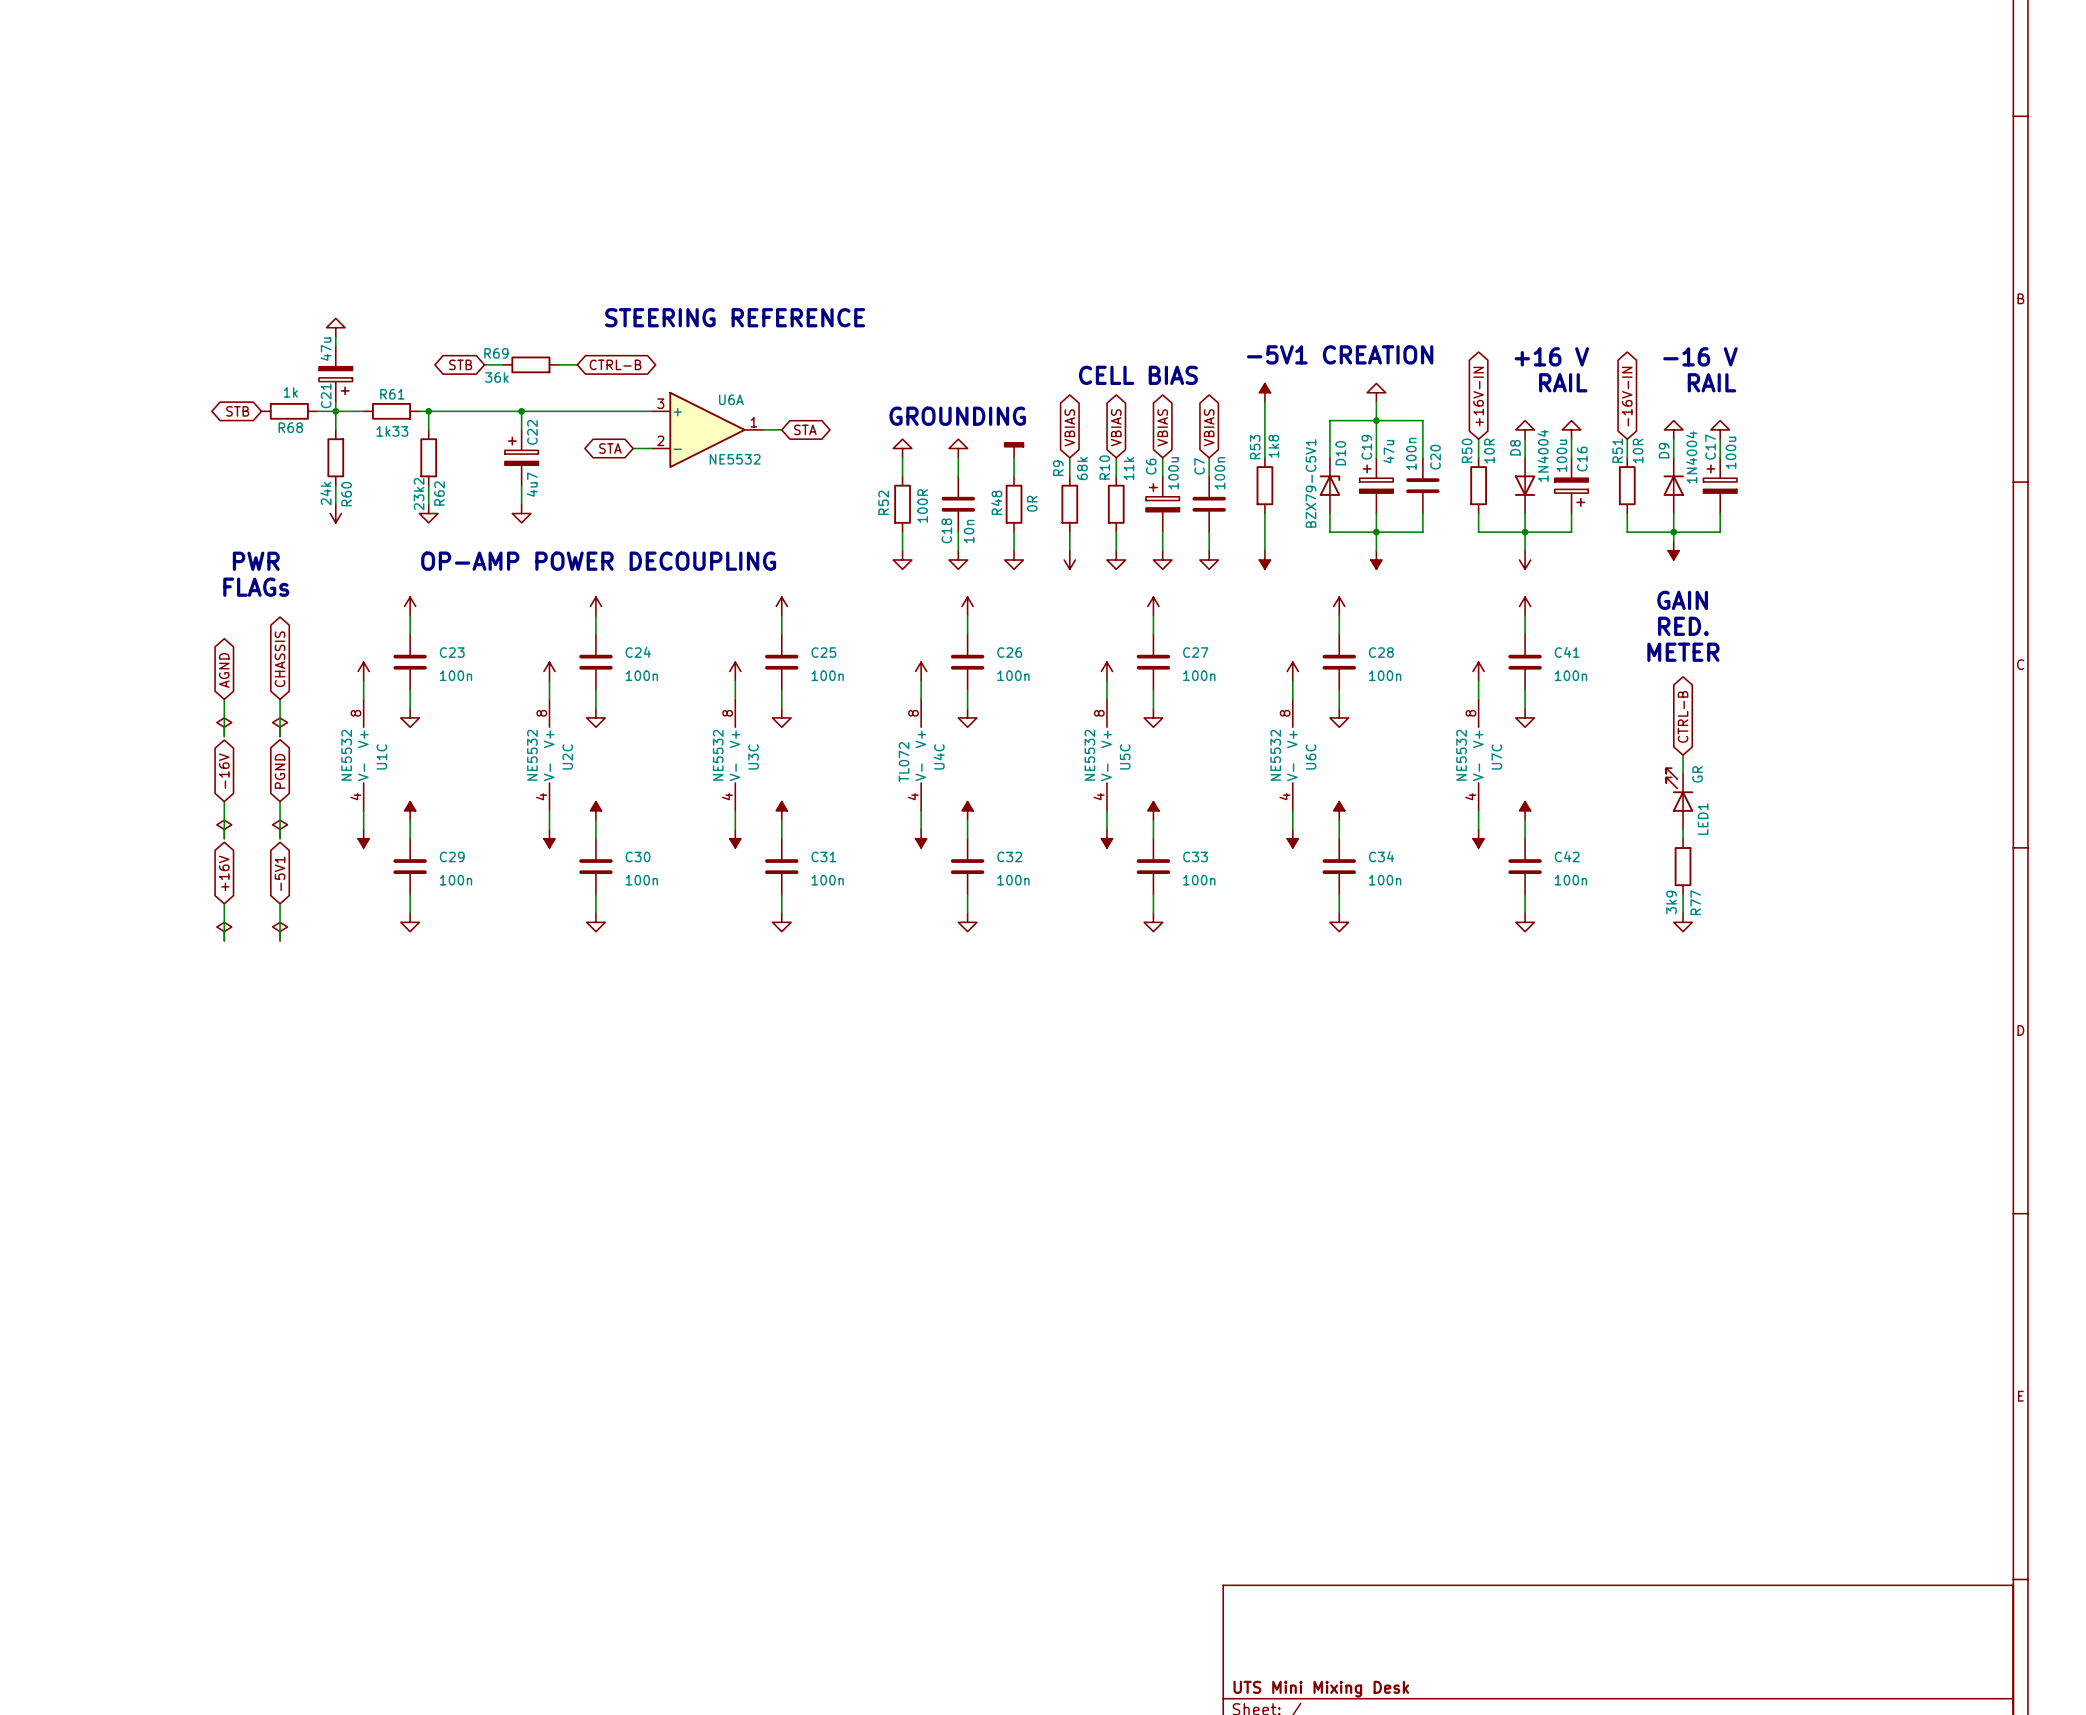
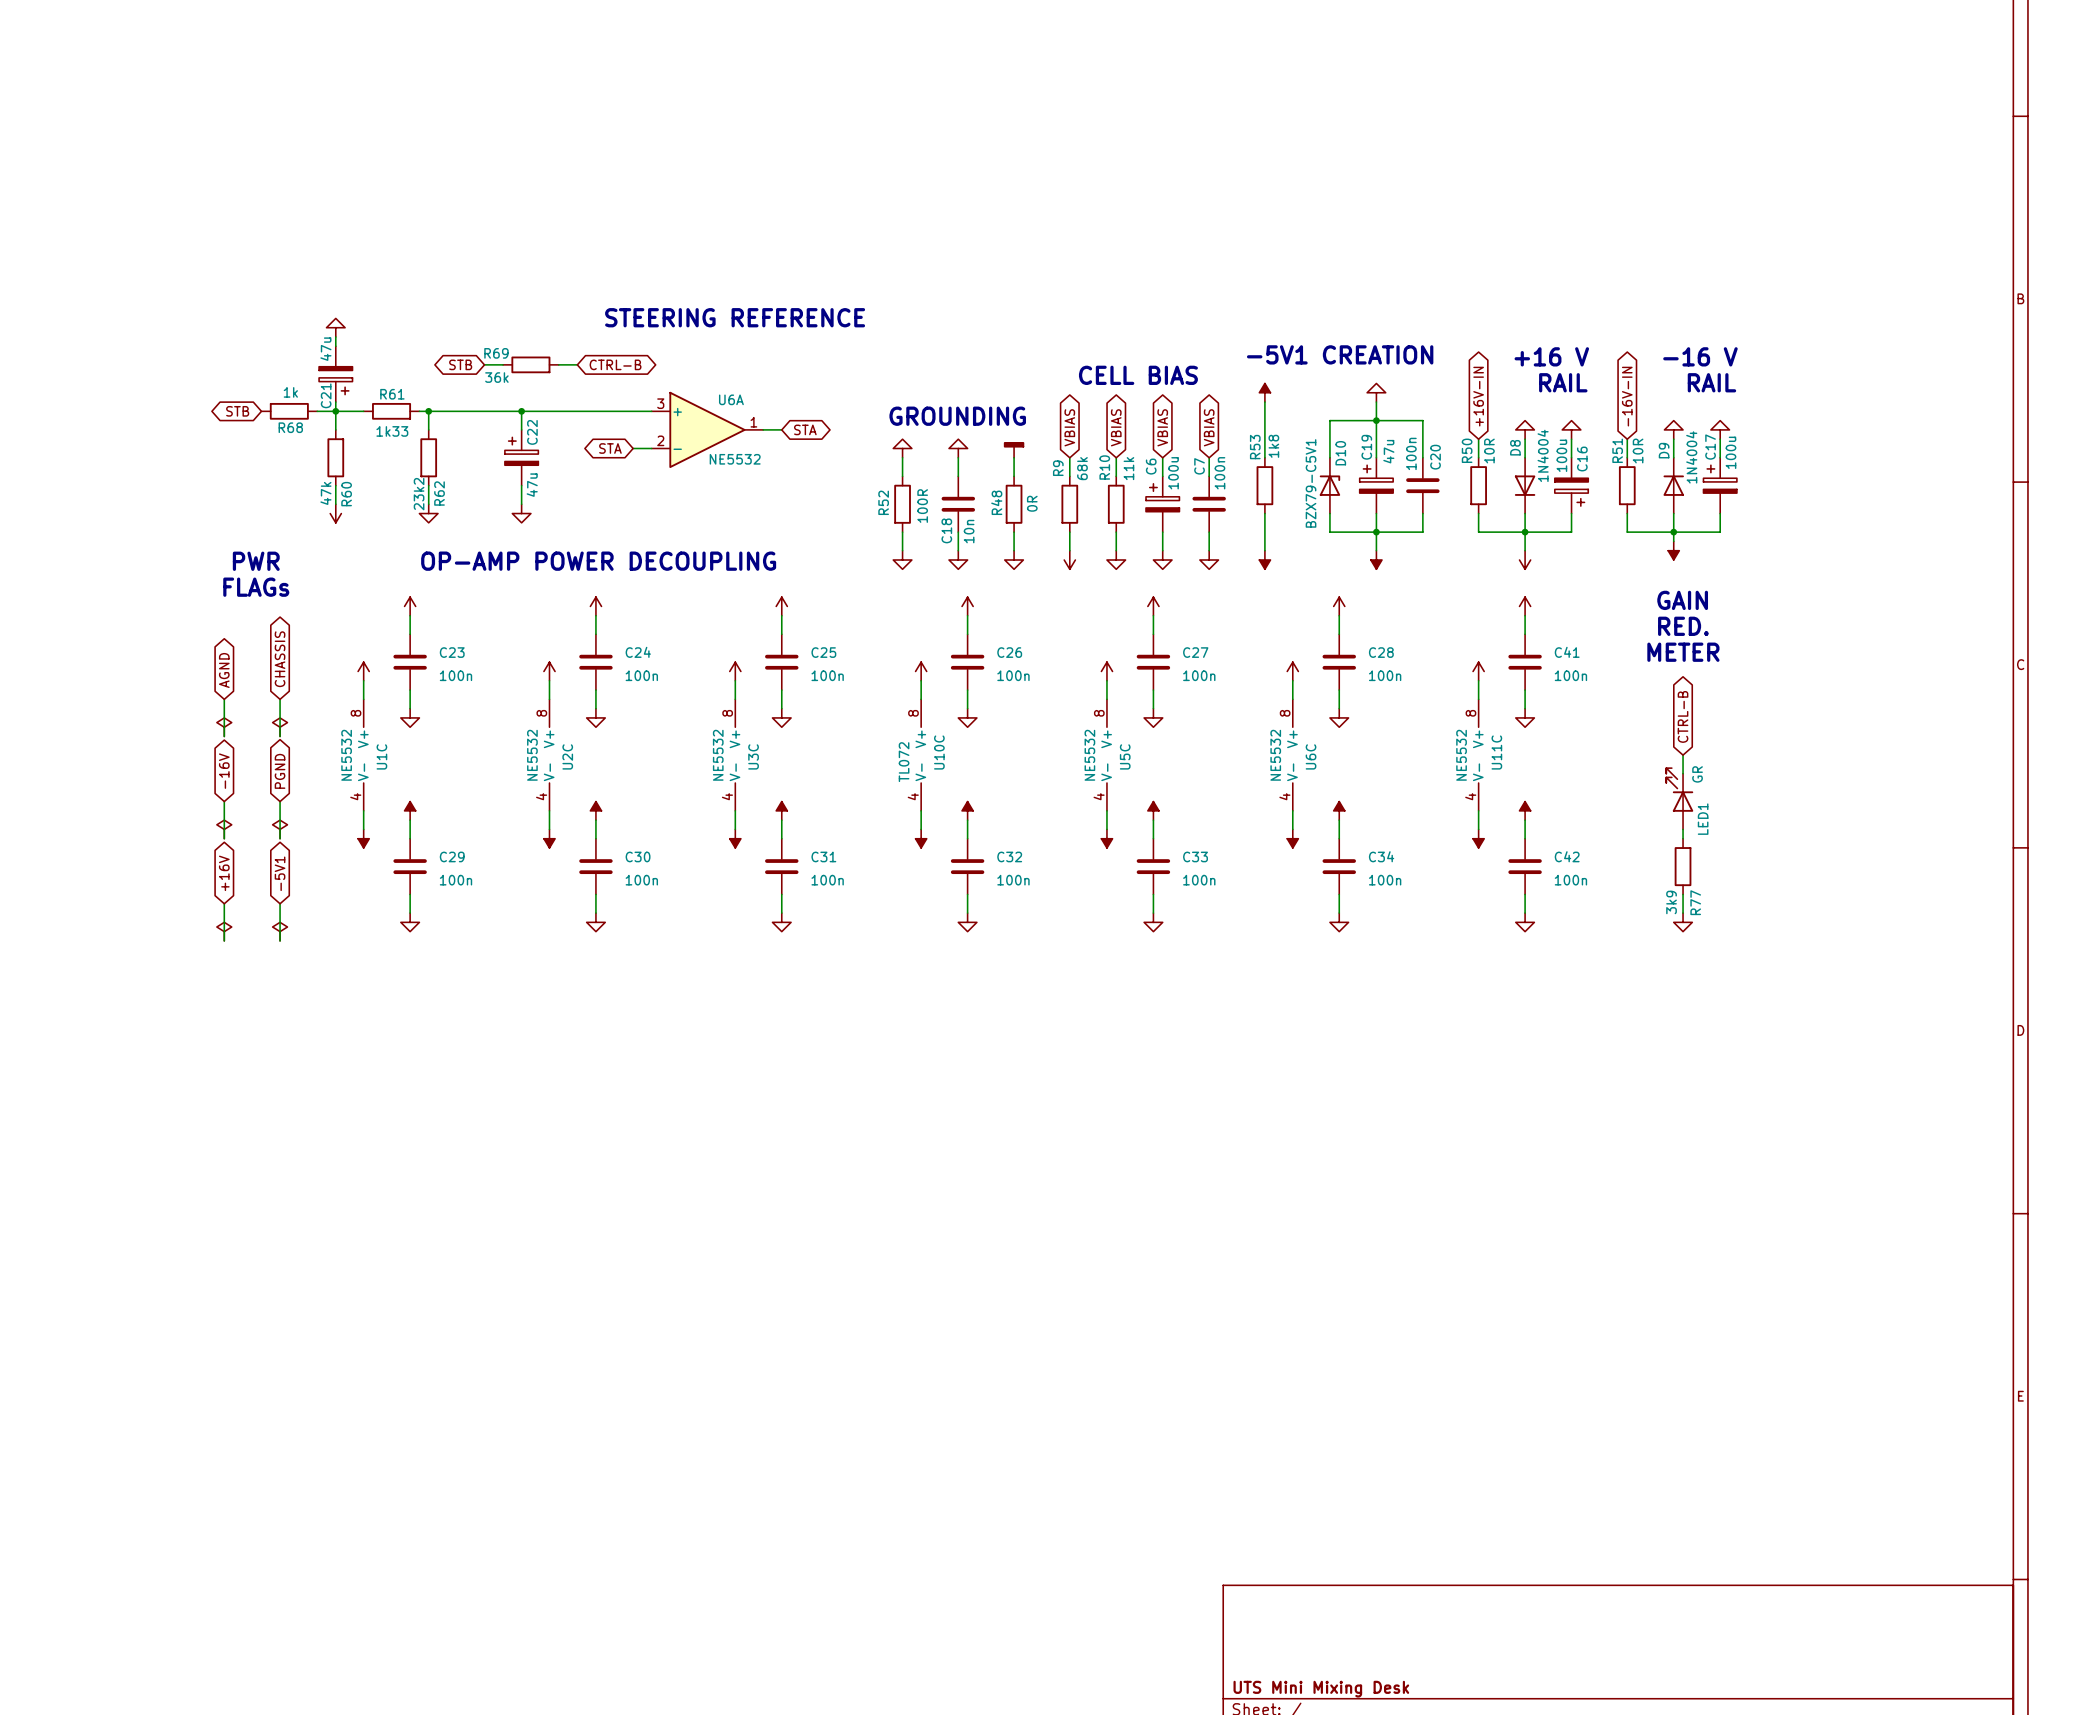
C22 value: 4u7 (532, 484) -> 47u (532, 485)
R60 value: 24k (325, 493) -> 47k (325, 493)
U4C name: U4C (939, 756) -> U10C (939, 752)
U7C name: U7C (1496, 756) -> U11C (1496, 752)

